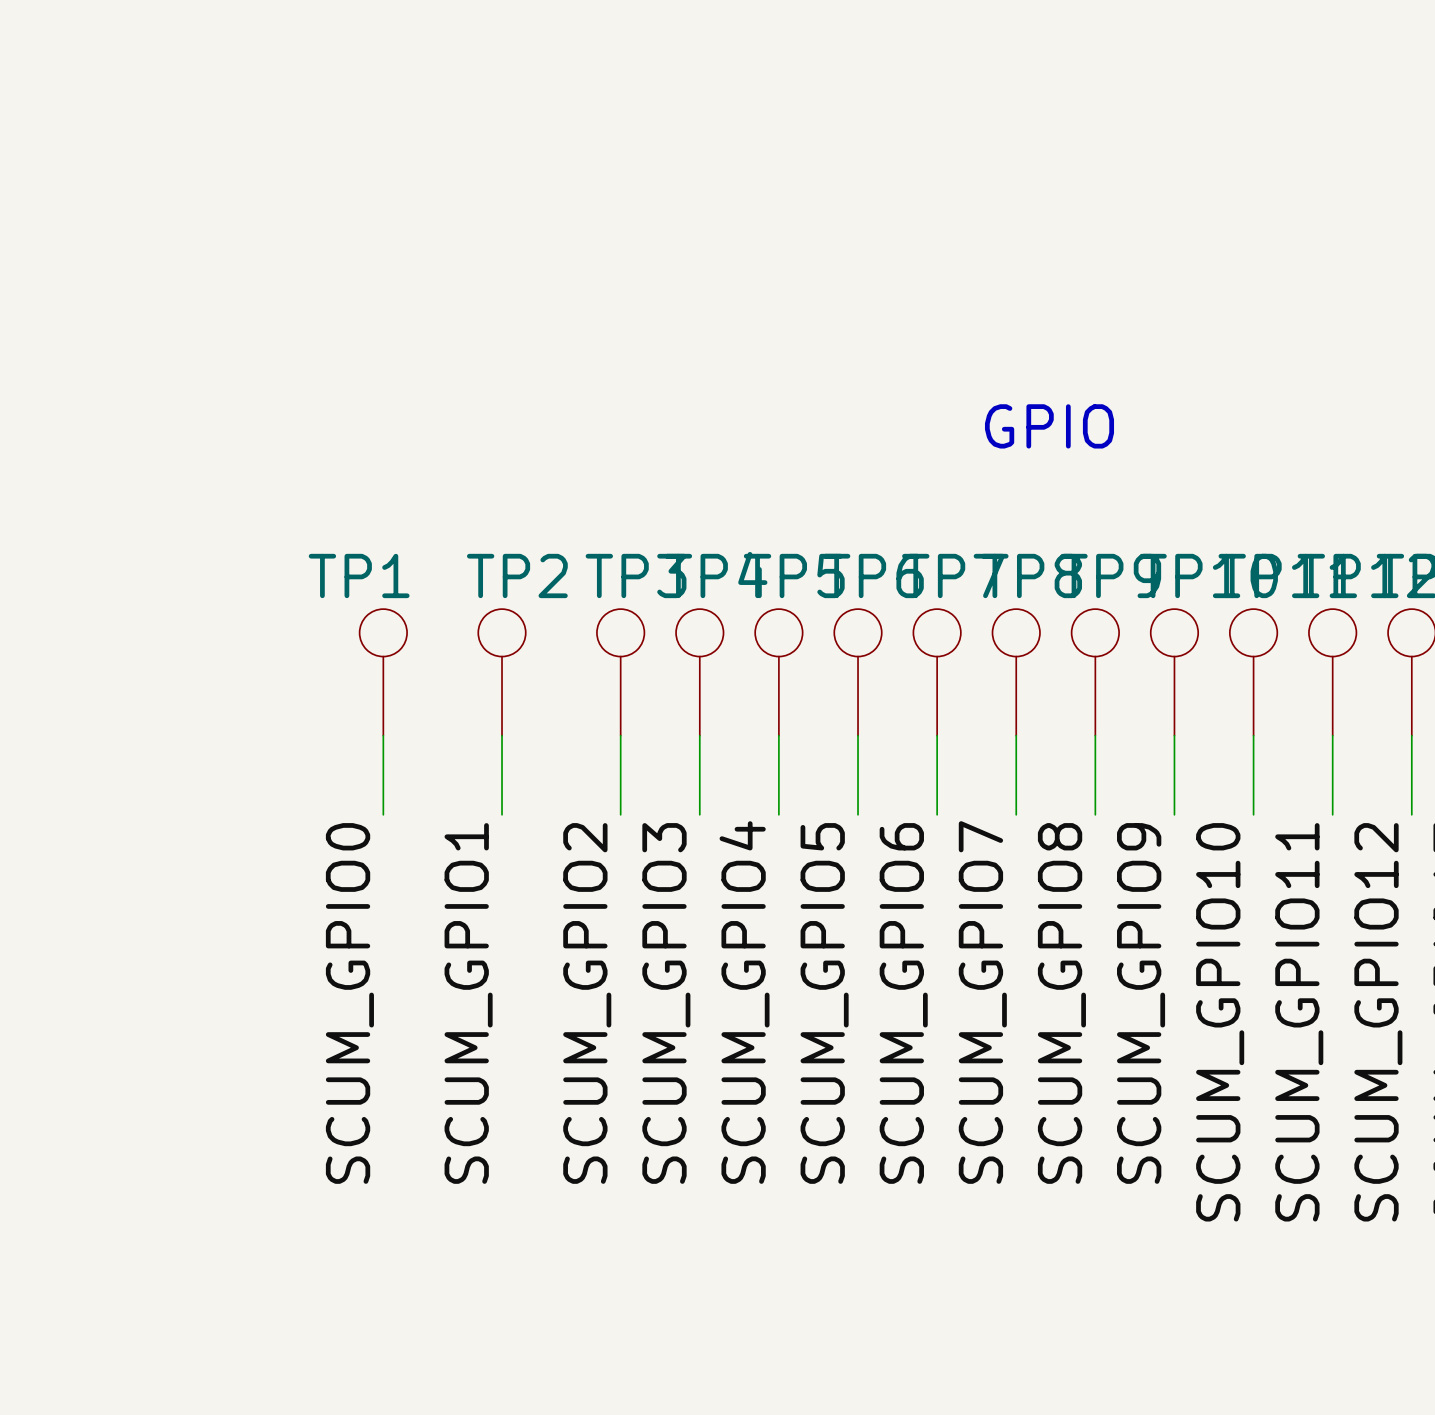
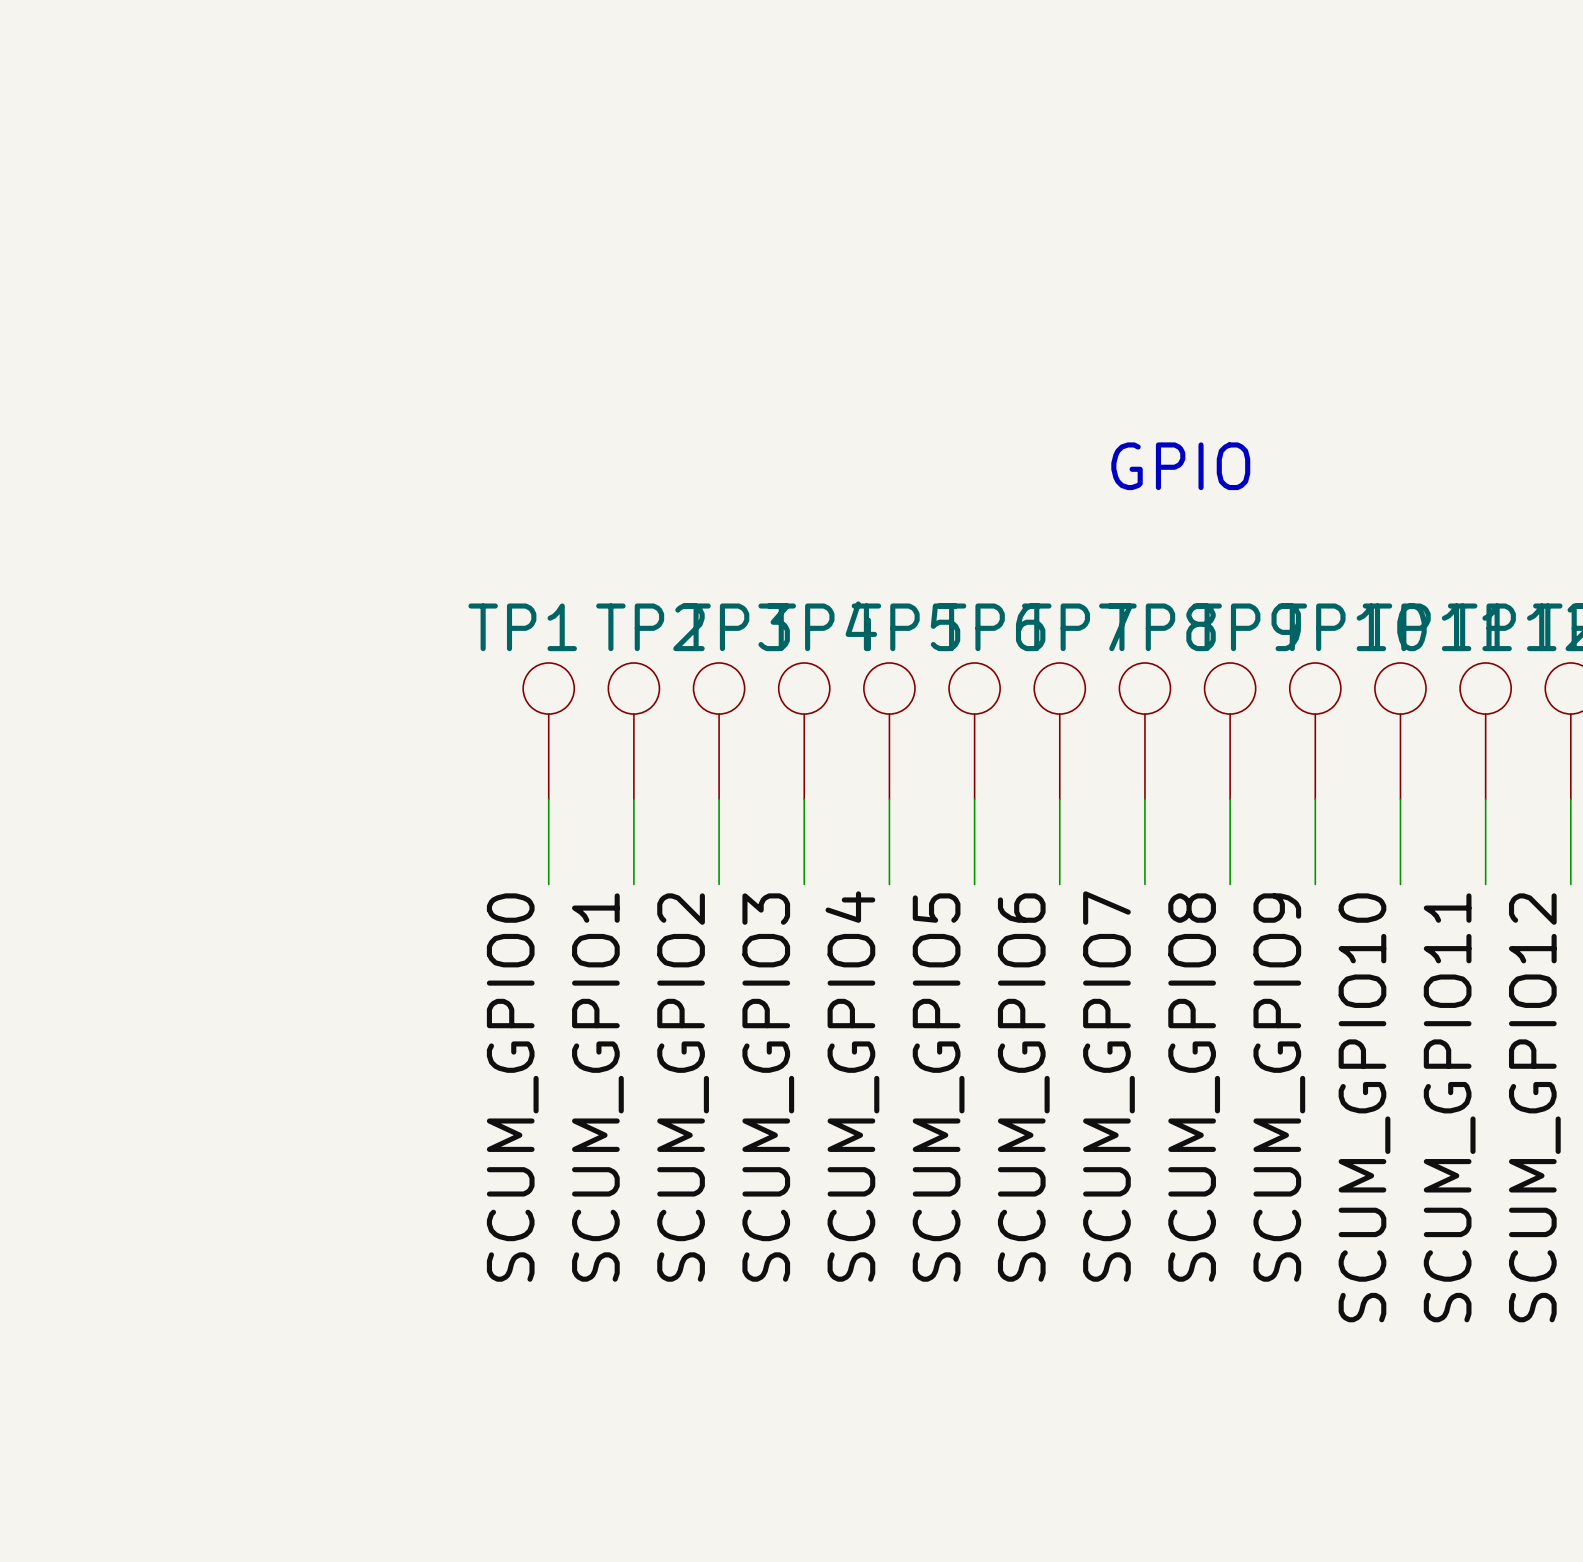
TP1 position: (383, 672) -> (548, 731)
TP2 position: (502, 672) -> (633, 731)
wire: (383, 735) (383, 814) -> (633, 799) (633, 884)
wire: (502, 735) (502, 814) -> (548, 799) (548, 884)
label position: SCUM_GPIO0 (349, 1003) -> SCUM_GPIO0 (512, 1087)
label position: SCUM_GPIO1 (468, 1003) -> SCUM_GPIO1 (597, 1087)

